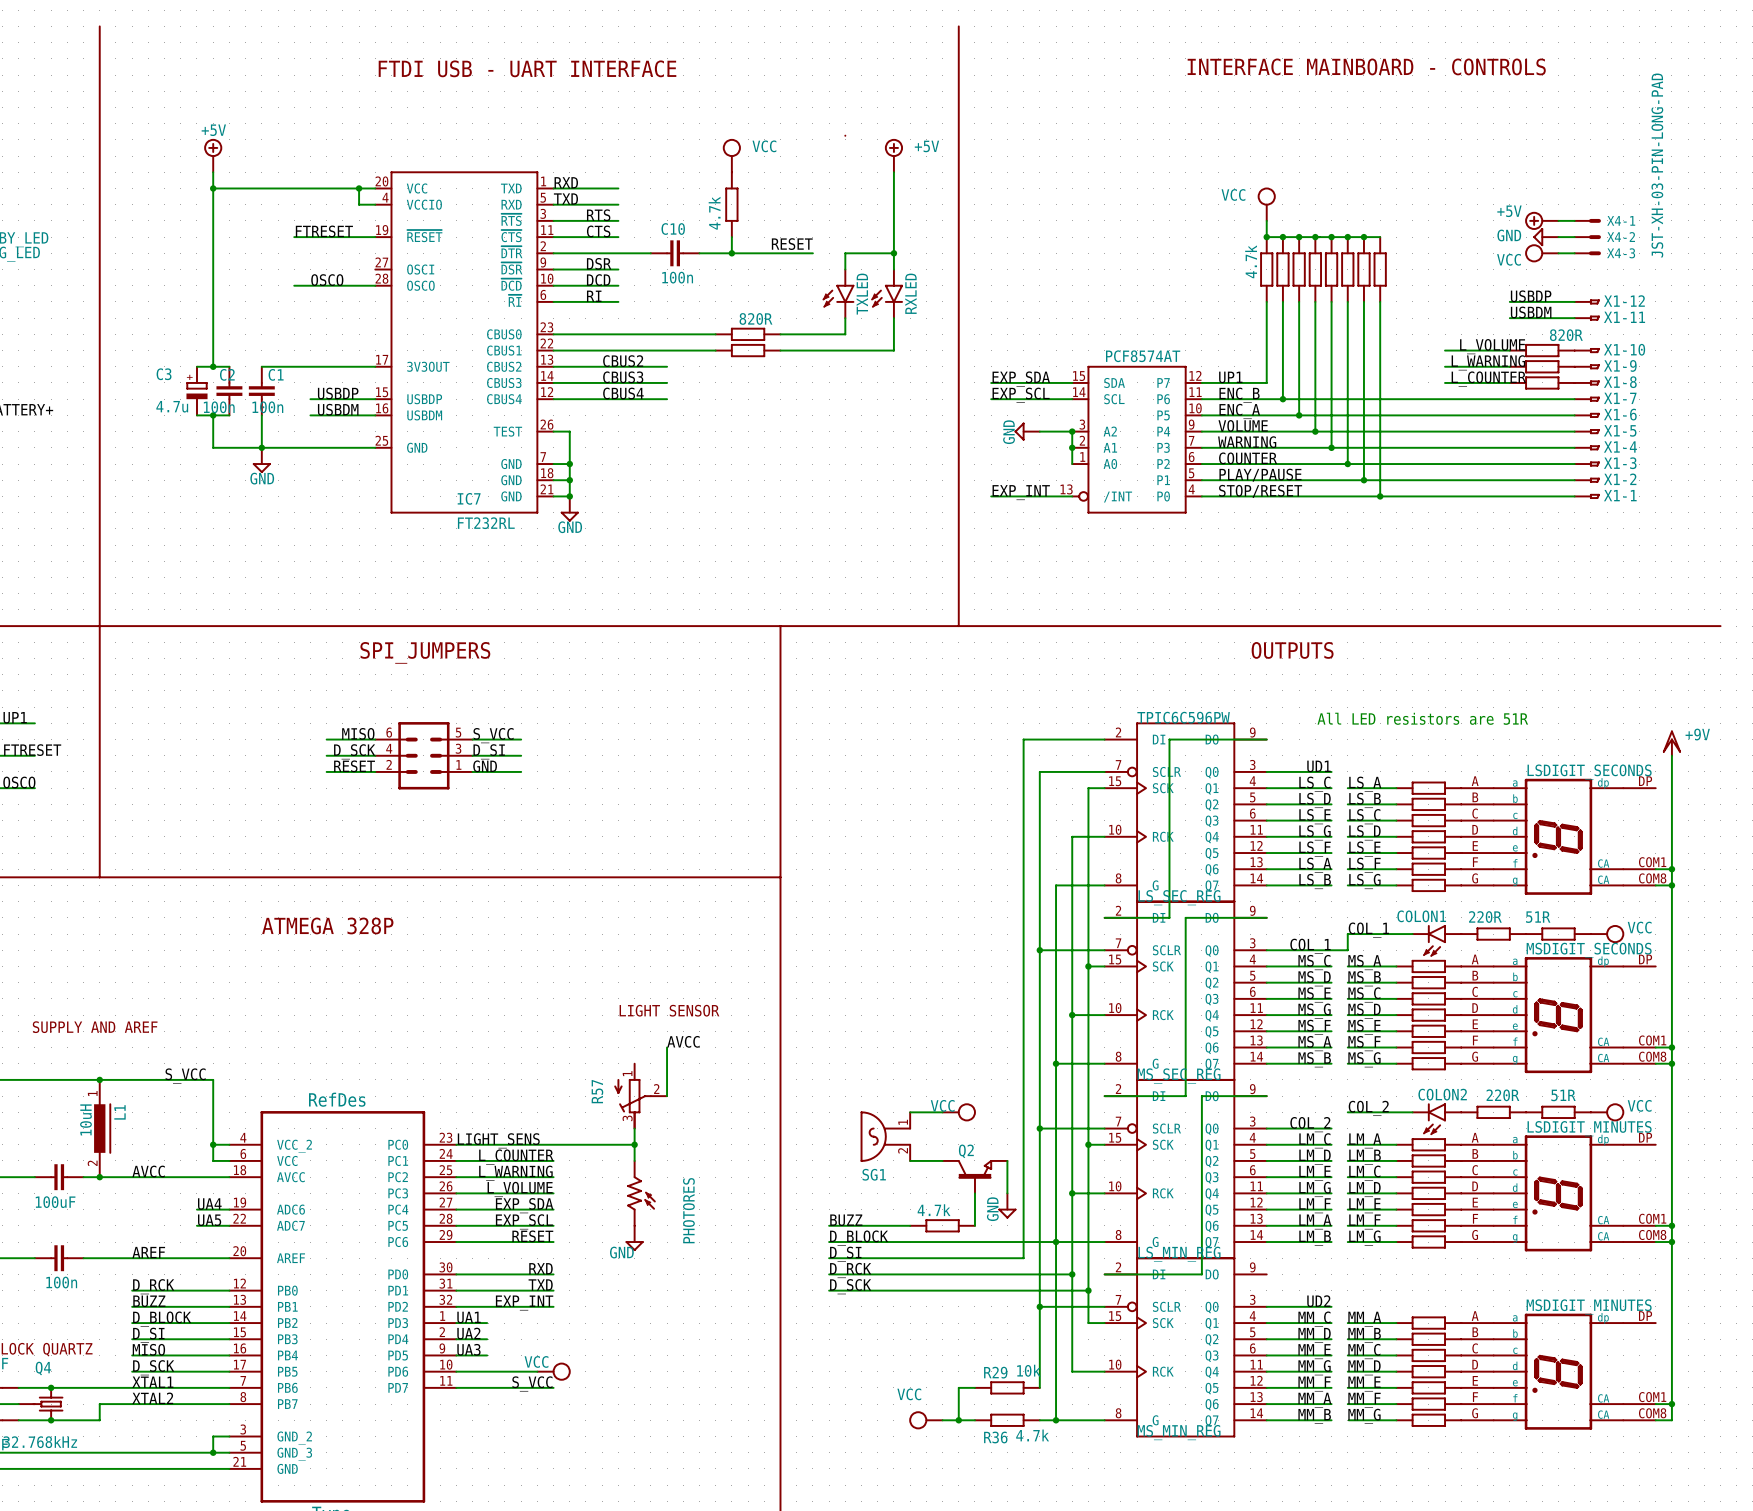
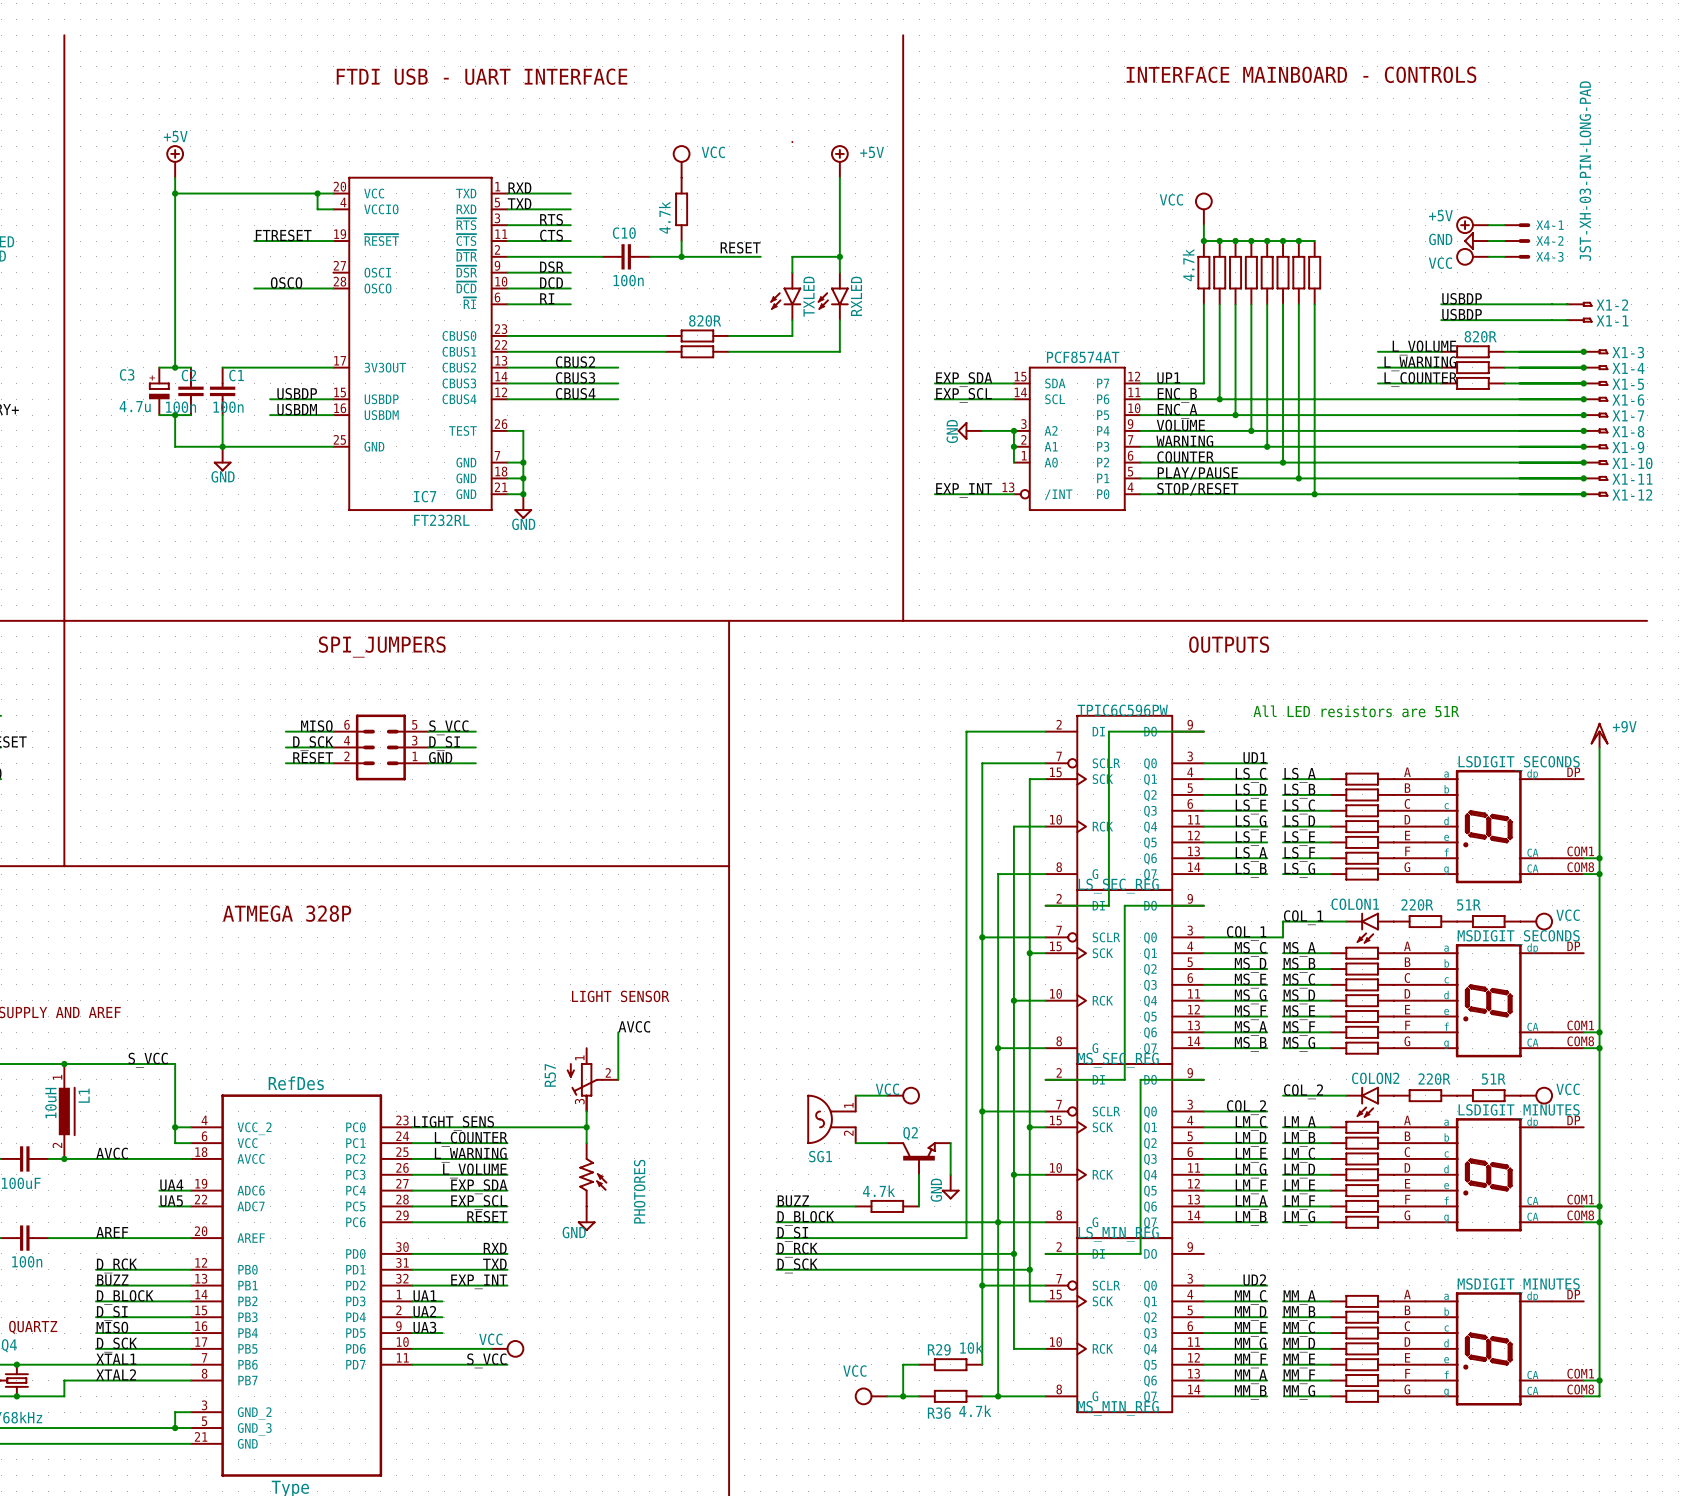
wire: none -> (1504, 304) (1567, 304)
X1-12 position: (1587, 301) -> (1595, 494)
X1-12 flip: as is (1594, 301) -> up-down (1603, 494)
label: USBDM (1531, 312) -> USBDP (1462, 314)
wire: none -> (1504, 320) (1567, 320)
X1-11 position: (1587, 318) -> (1595, 478)
X1-11 flip: as is (1594, 318) -> up-down (1603, 478)
part value position: 820R (1566, 335) -> 820R (1480, 336)
wire: none -> (1504, 351) (1583, 351)
X1-10 position: (1587, 350) -> (1595, 462)
X1-10 flip: as is (1594, 350) -> up-down (1603, 462)
junction: none -> (1583, 351)
wire: none -> (1504, 367) (1583, 367)
X1-9 position: (1587, 366) -> (1595, 446)
X1-9 flip: as is (1594, 366) -> up-down (1603, 446)
junction: none -> (1583, 367)
wire: none -> (1504, 383) (1583, 383)
X1-8 position: (1587, 382) -> (1595, 430)
X1-8 flip: as is (1594, 382) -> up-down (1603, 430)
junction: none -> (1583, 383)
wire: none -> (1504, 399) (1583, 399)
X1-7 position: (1587, 399) -> (1595, 415)
X1-7 flip: as is (1594, 399) -> up-down (1603, 415)
junction: none -> (1583, 399)
wire: none -> (1504, 415) (1583, 415)
X1-6 position: (1587, 415) -> (1595, 399)
X1-6 flip: as is (1594, 415) -> up-down (1603, 399)
junction: none -> (1583, 415)
wire: none -> (1504, 430) (1583, 430)
X1-5 position: (1587, 431) -> (1595, 383)
X1-5 flip: as is (1594, 431) -> up-down (1603, 383)
junction: none -> (1583, 430)
wire: none -> (1504, 446) (1583, 446)
X1-4 position: (1587, 447) -> (1595, 367)
X1-4 flip: as is (1594, 447) -> up-down (1603, 367)
junction: none -> (1583, 446)
wire: none -> (1504, 462) (1583, 462)
X1-3 position: (1587, 464) -> (1595, 351)
X1-3 flip: as is (1594, 464) -> up-down (1603, 351)
junction: none -> (1583, 462)
wire: none -> (1504, 478) (1583, 478)
X1-2 position: (1587, 480) -> (1580, 304)
X1-2 flip: as is (1594, 480) -> up-down (1587, 304)
junction: none -> (1583, 478)
wire: none -> (1504, 494) (1583, 494)
X1-1 position: (1587, 496) -> (1580, 320)
X1-1 flip: as is (1594, 496) -> up-down (1587, 320)
junction: none -> (1583, 494)

